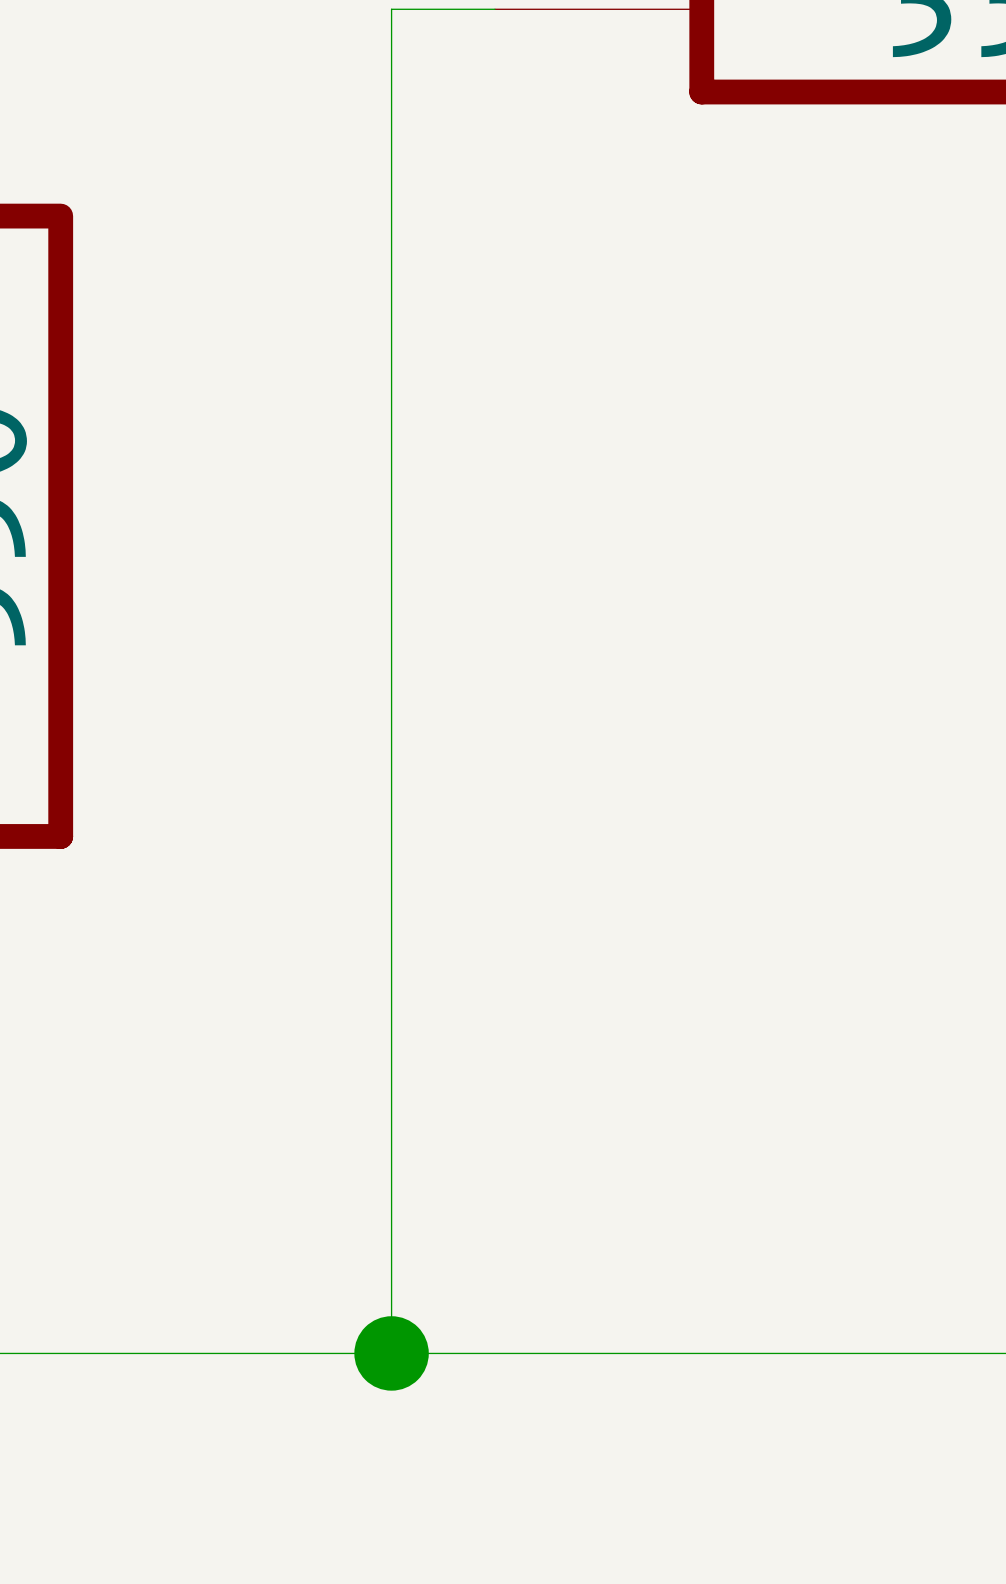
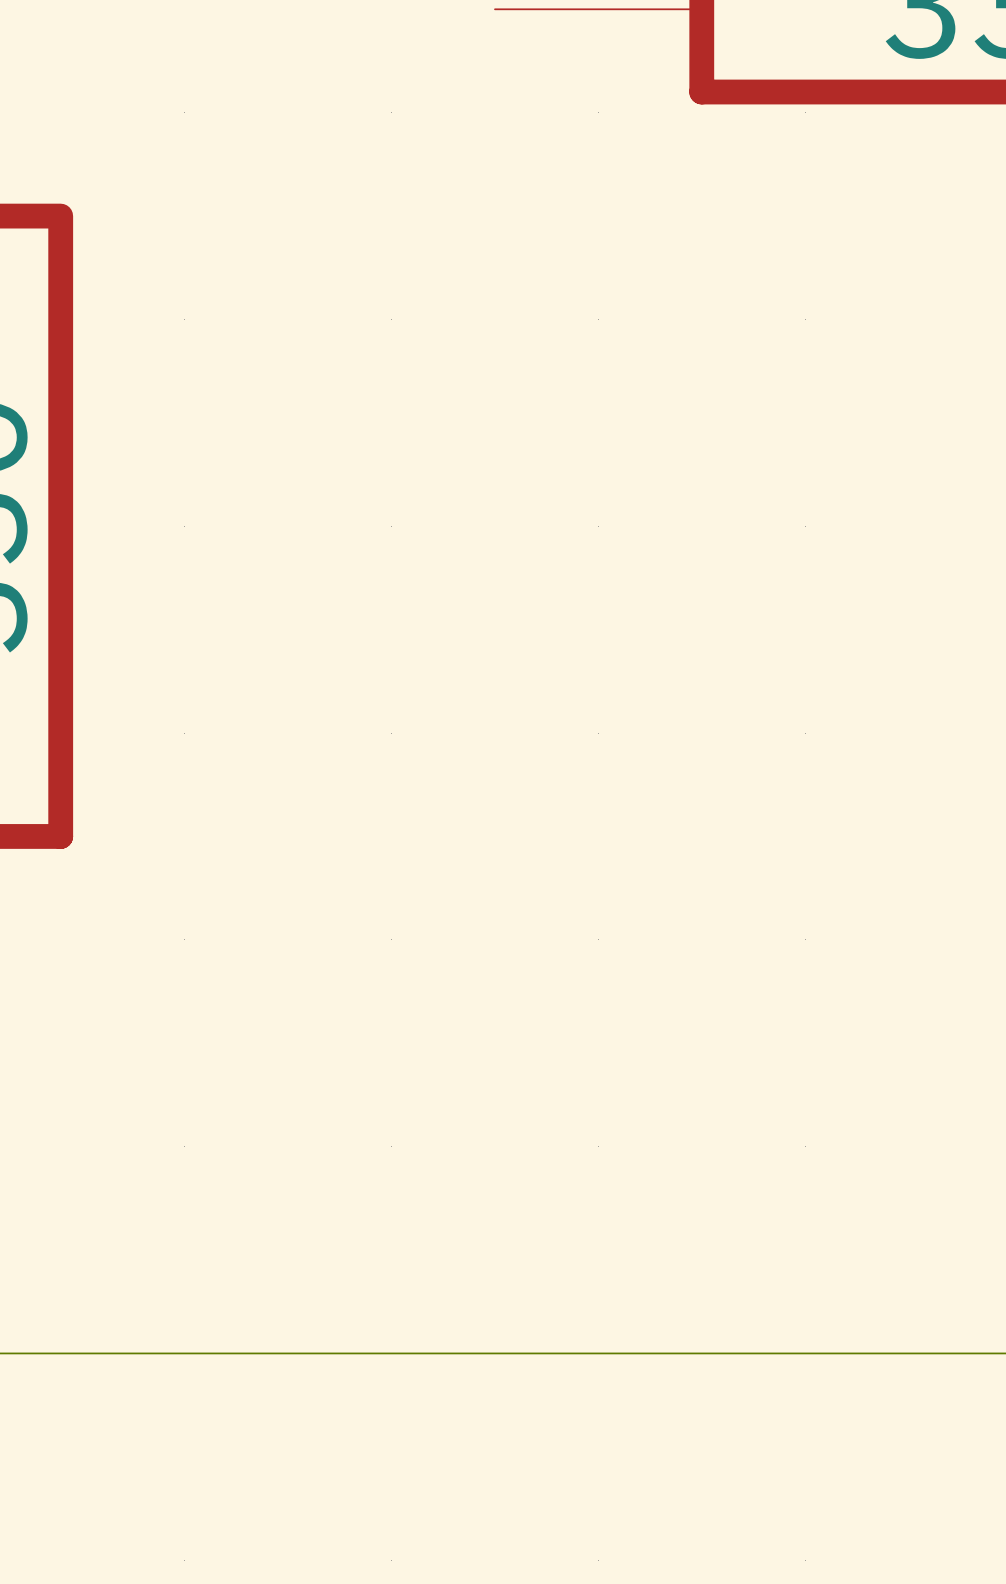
wire: (494, 9) (391, 9) (391, 1353) -> none
junction: (391, 1353) -> none

